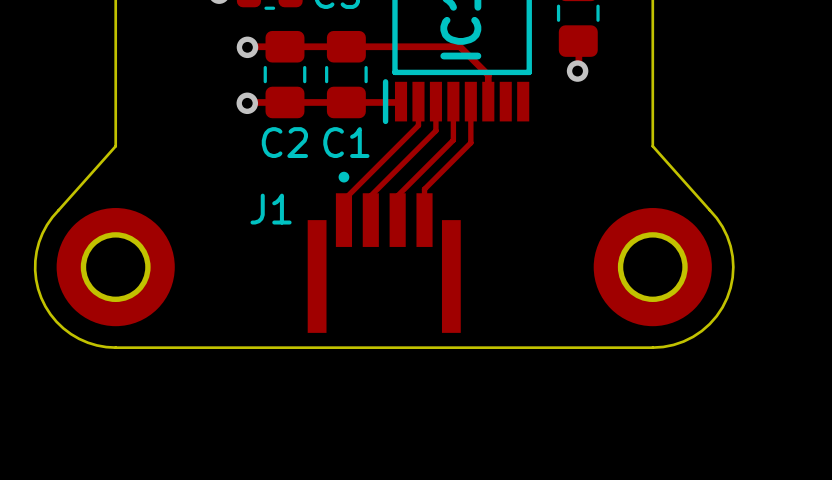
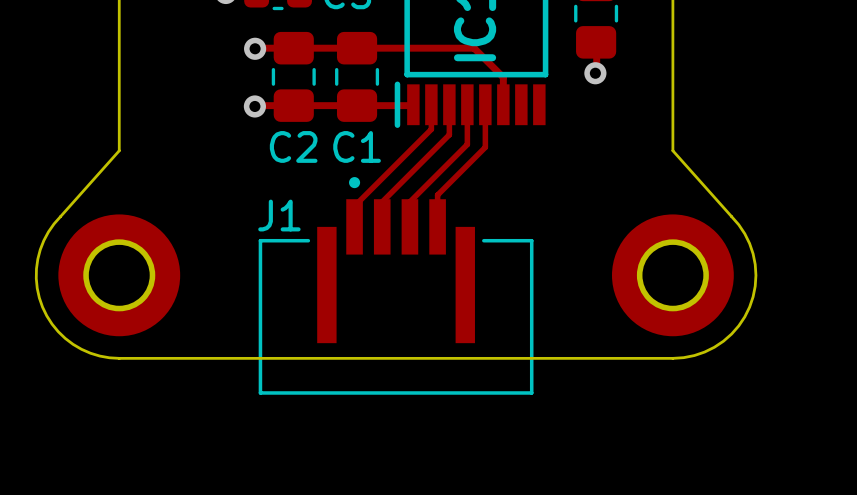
J1 footprint: [307, 171, 461, 333] -> [258, 177, 534, 395]

